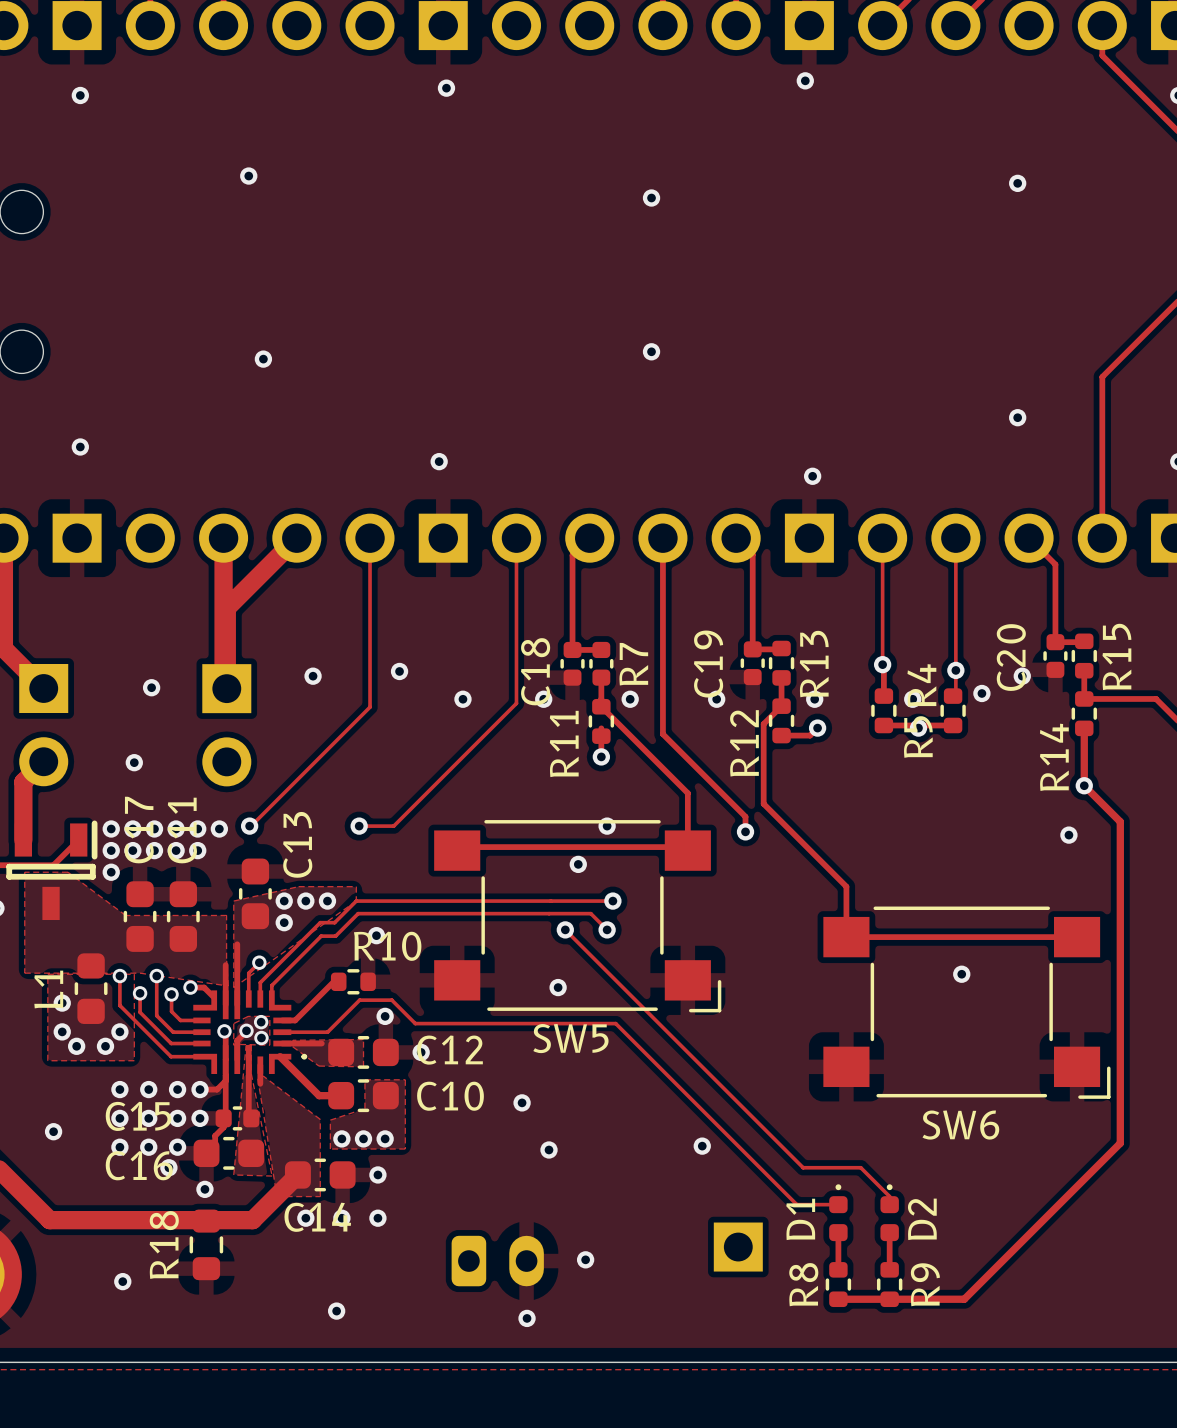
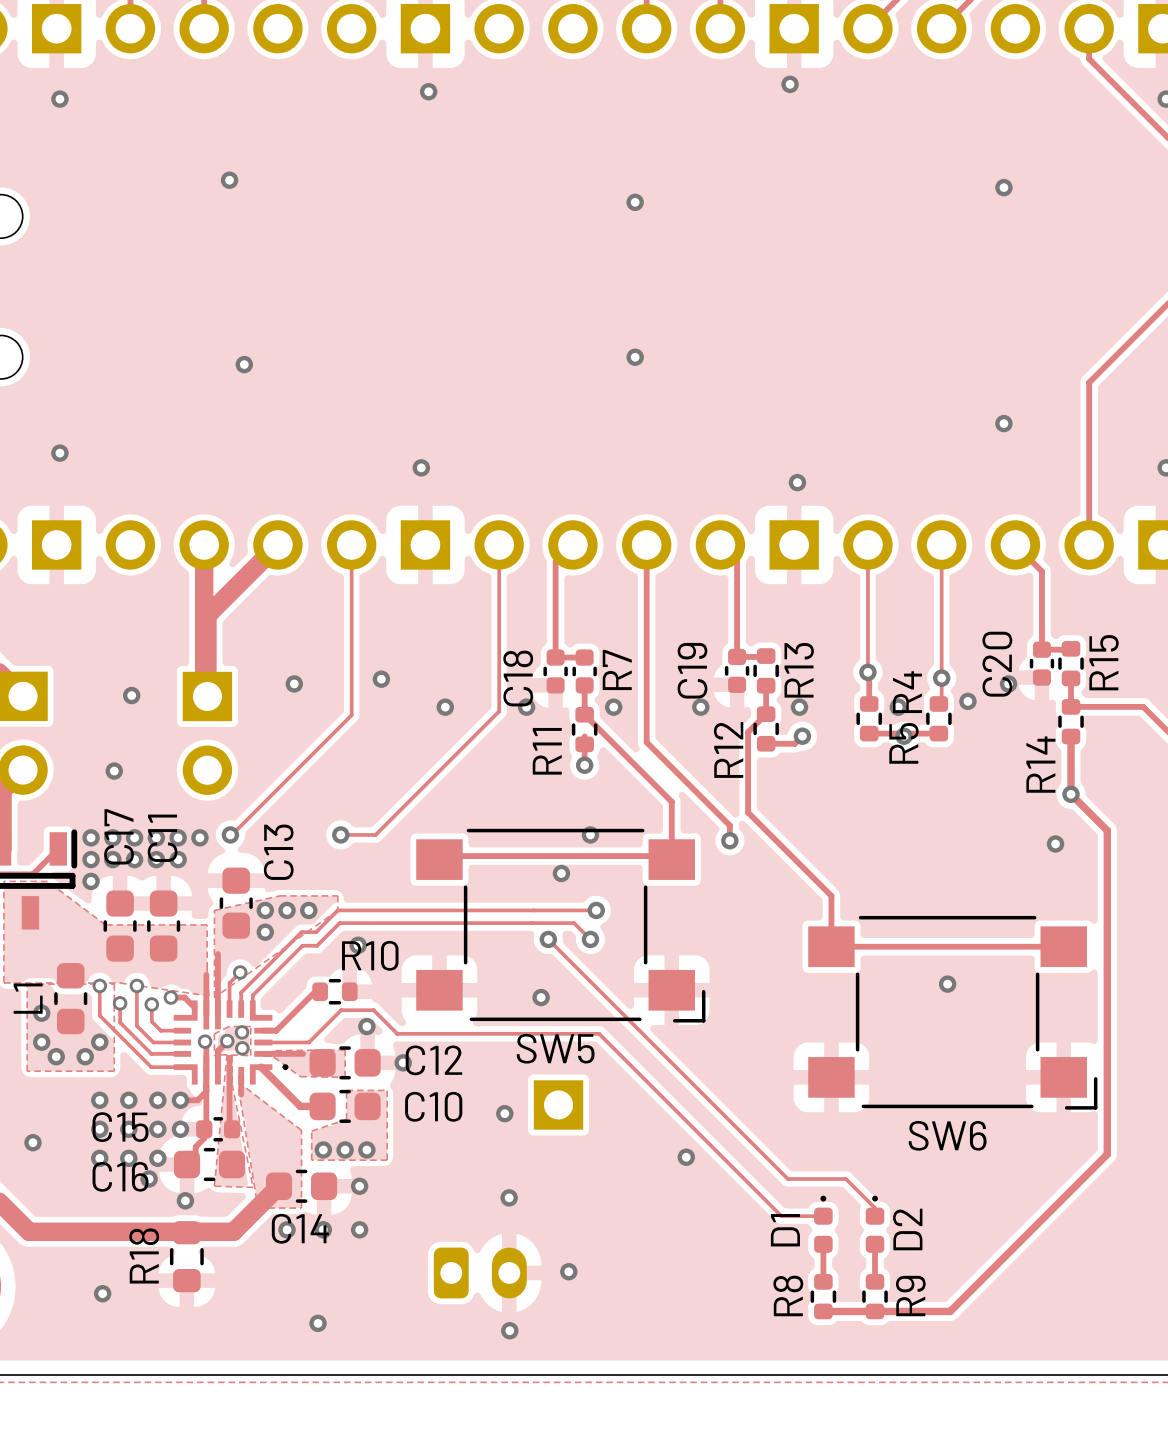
via position: (549, 1149) -> (509, 1197)
part position: (738, 1247) -> (558, 1104)

